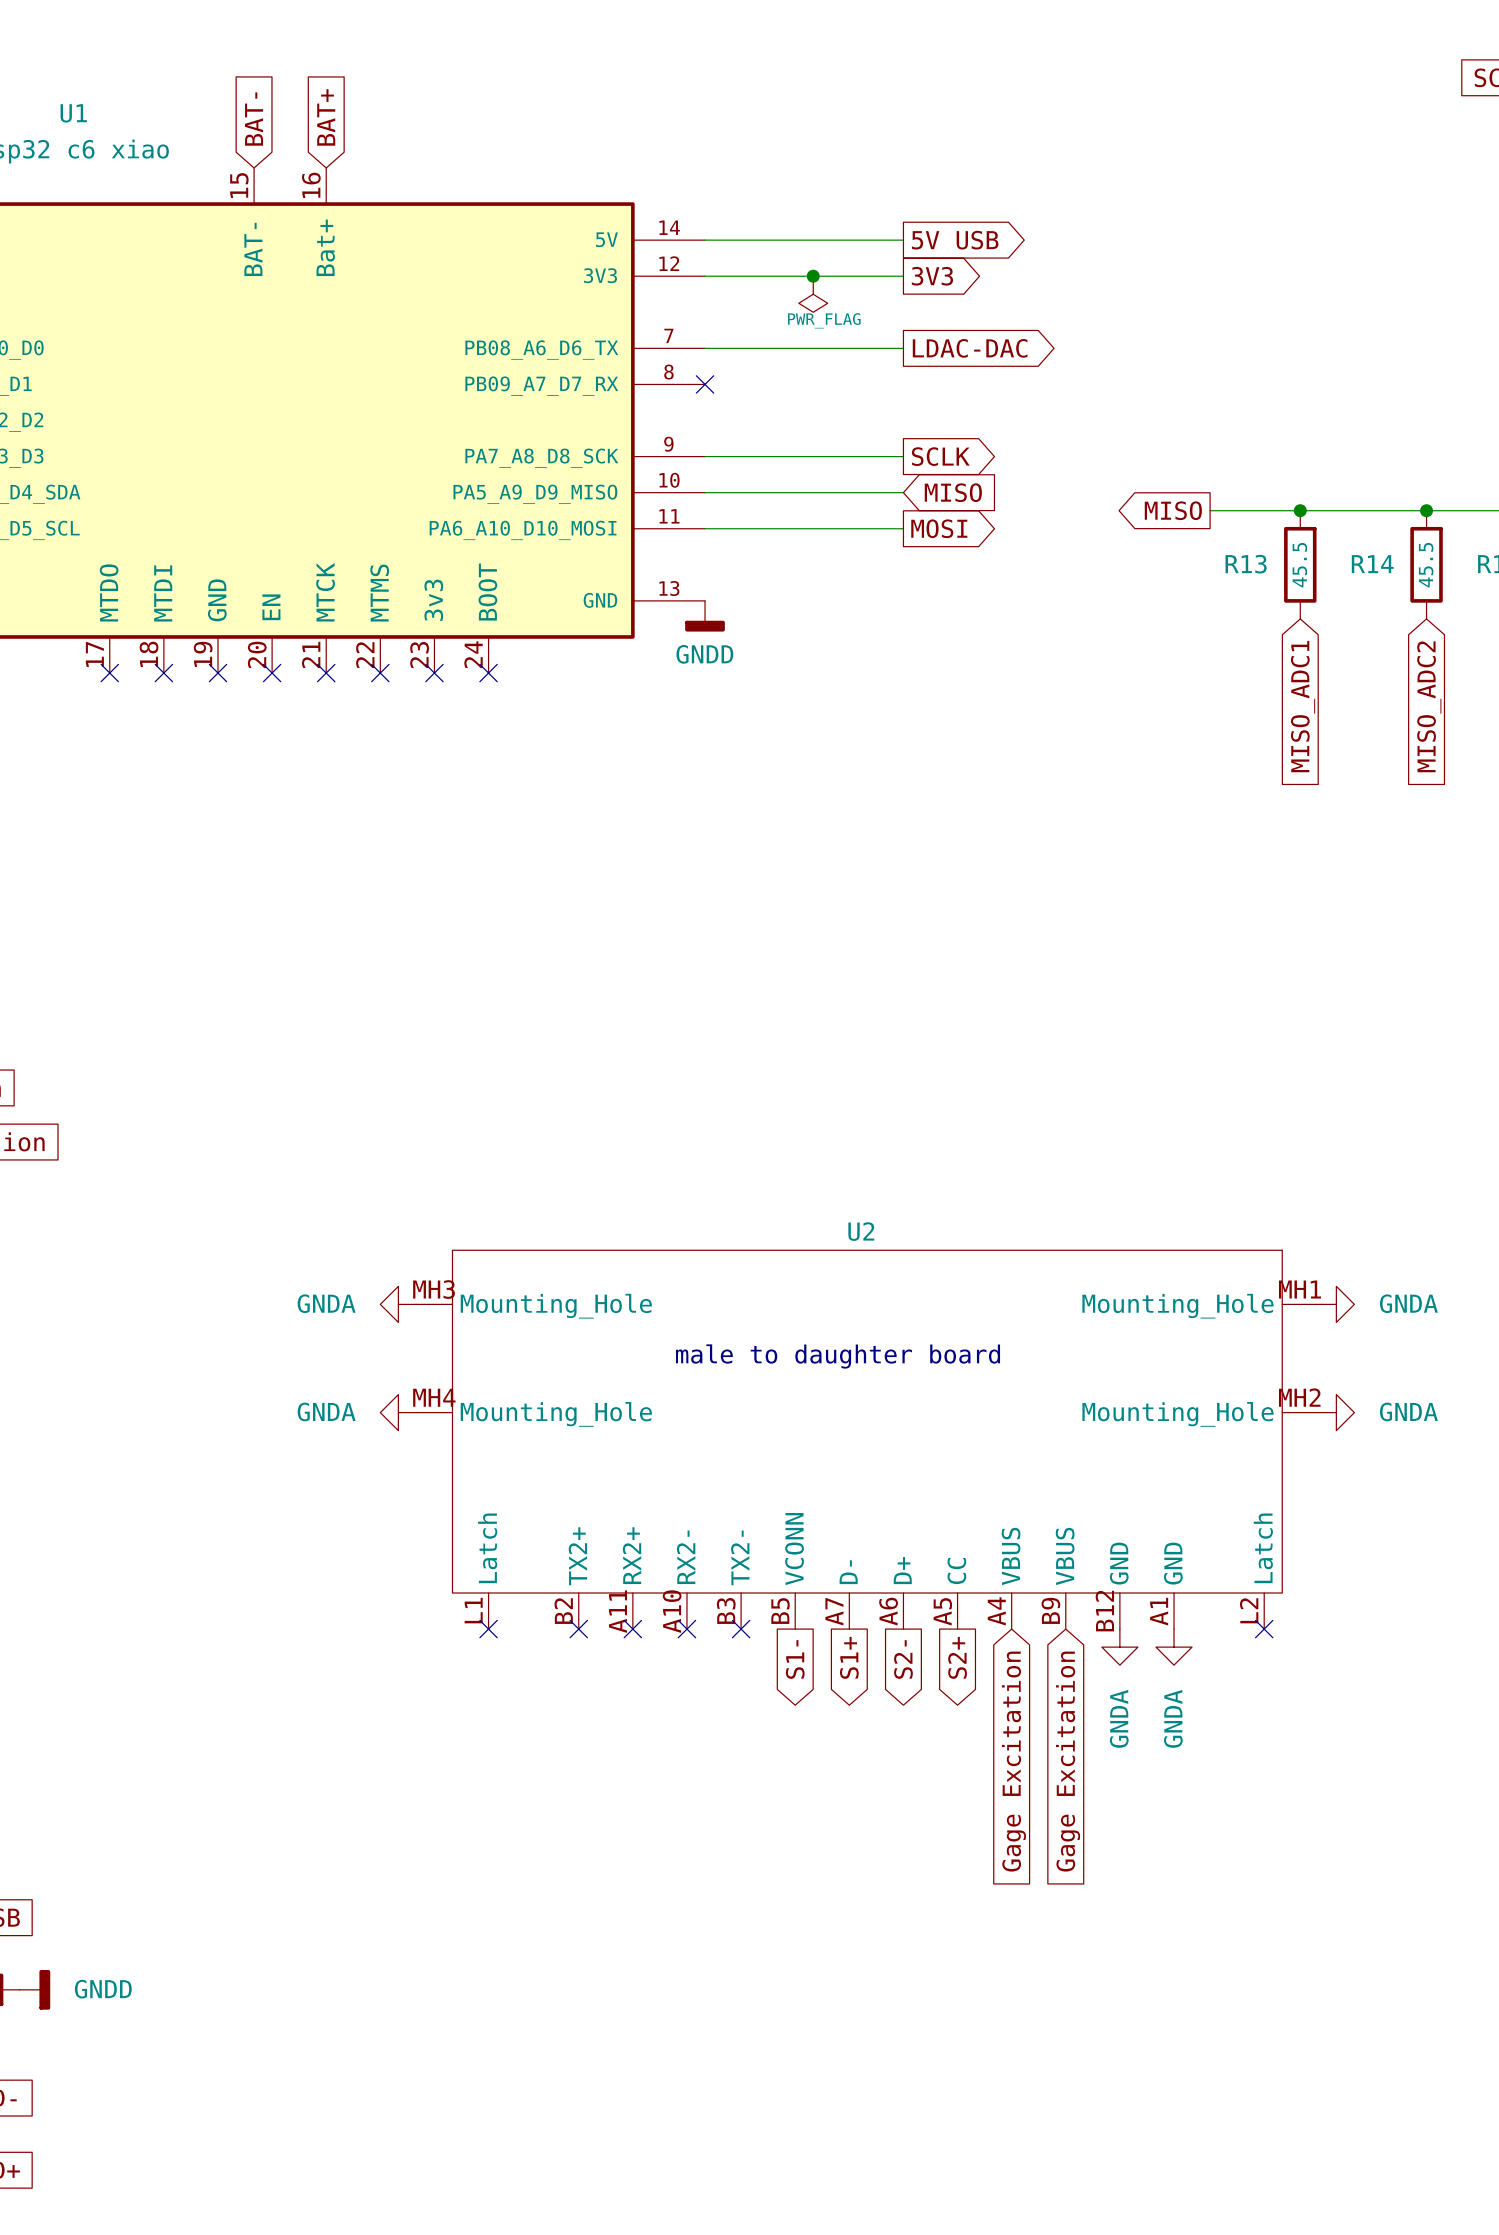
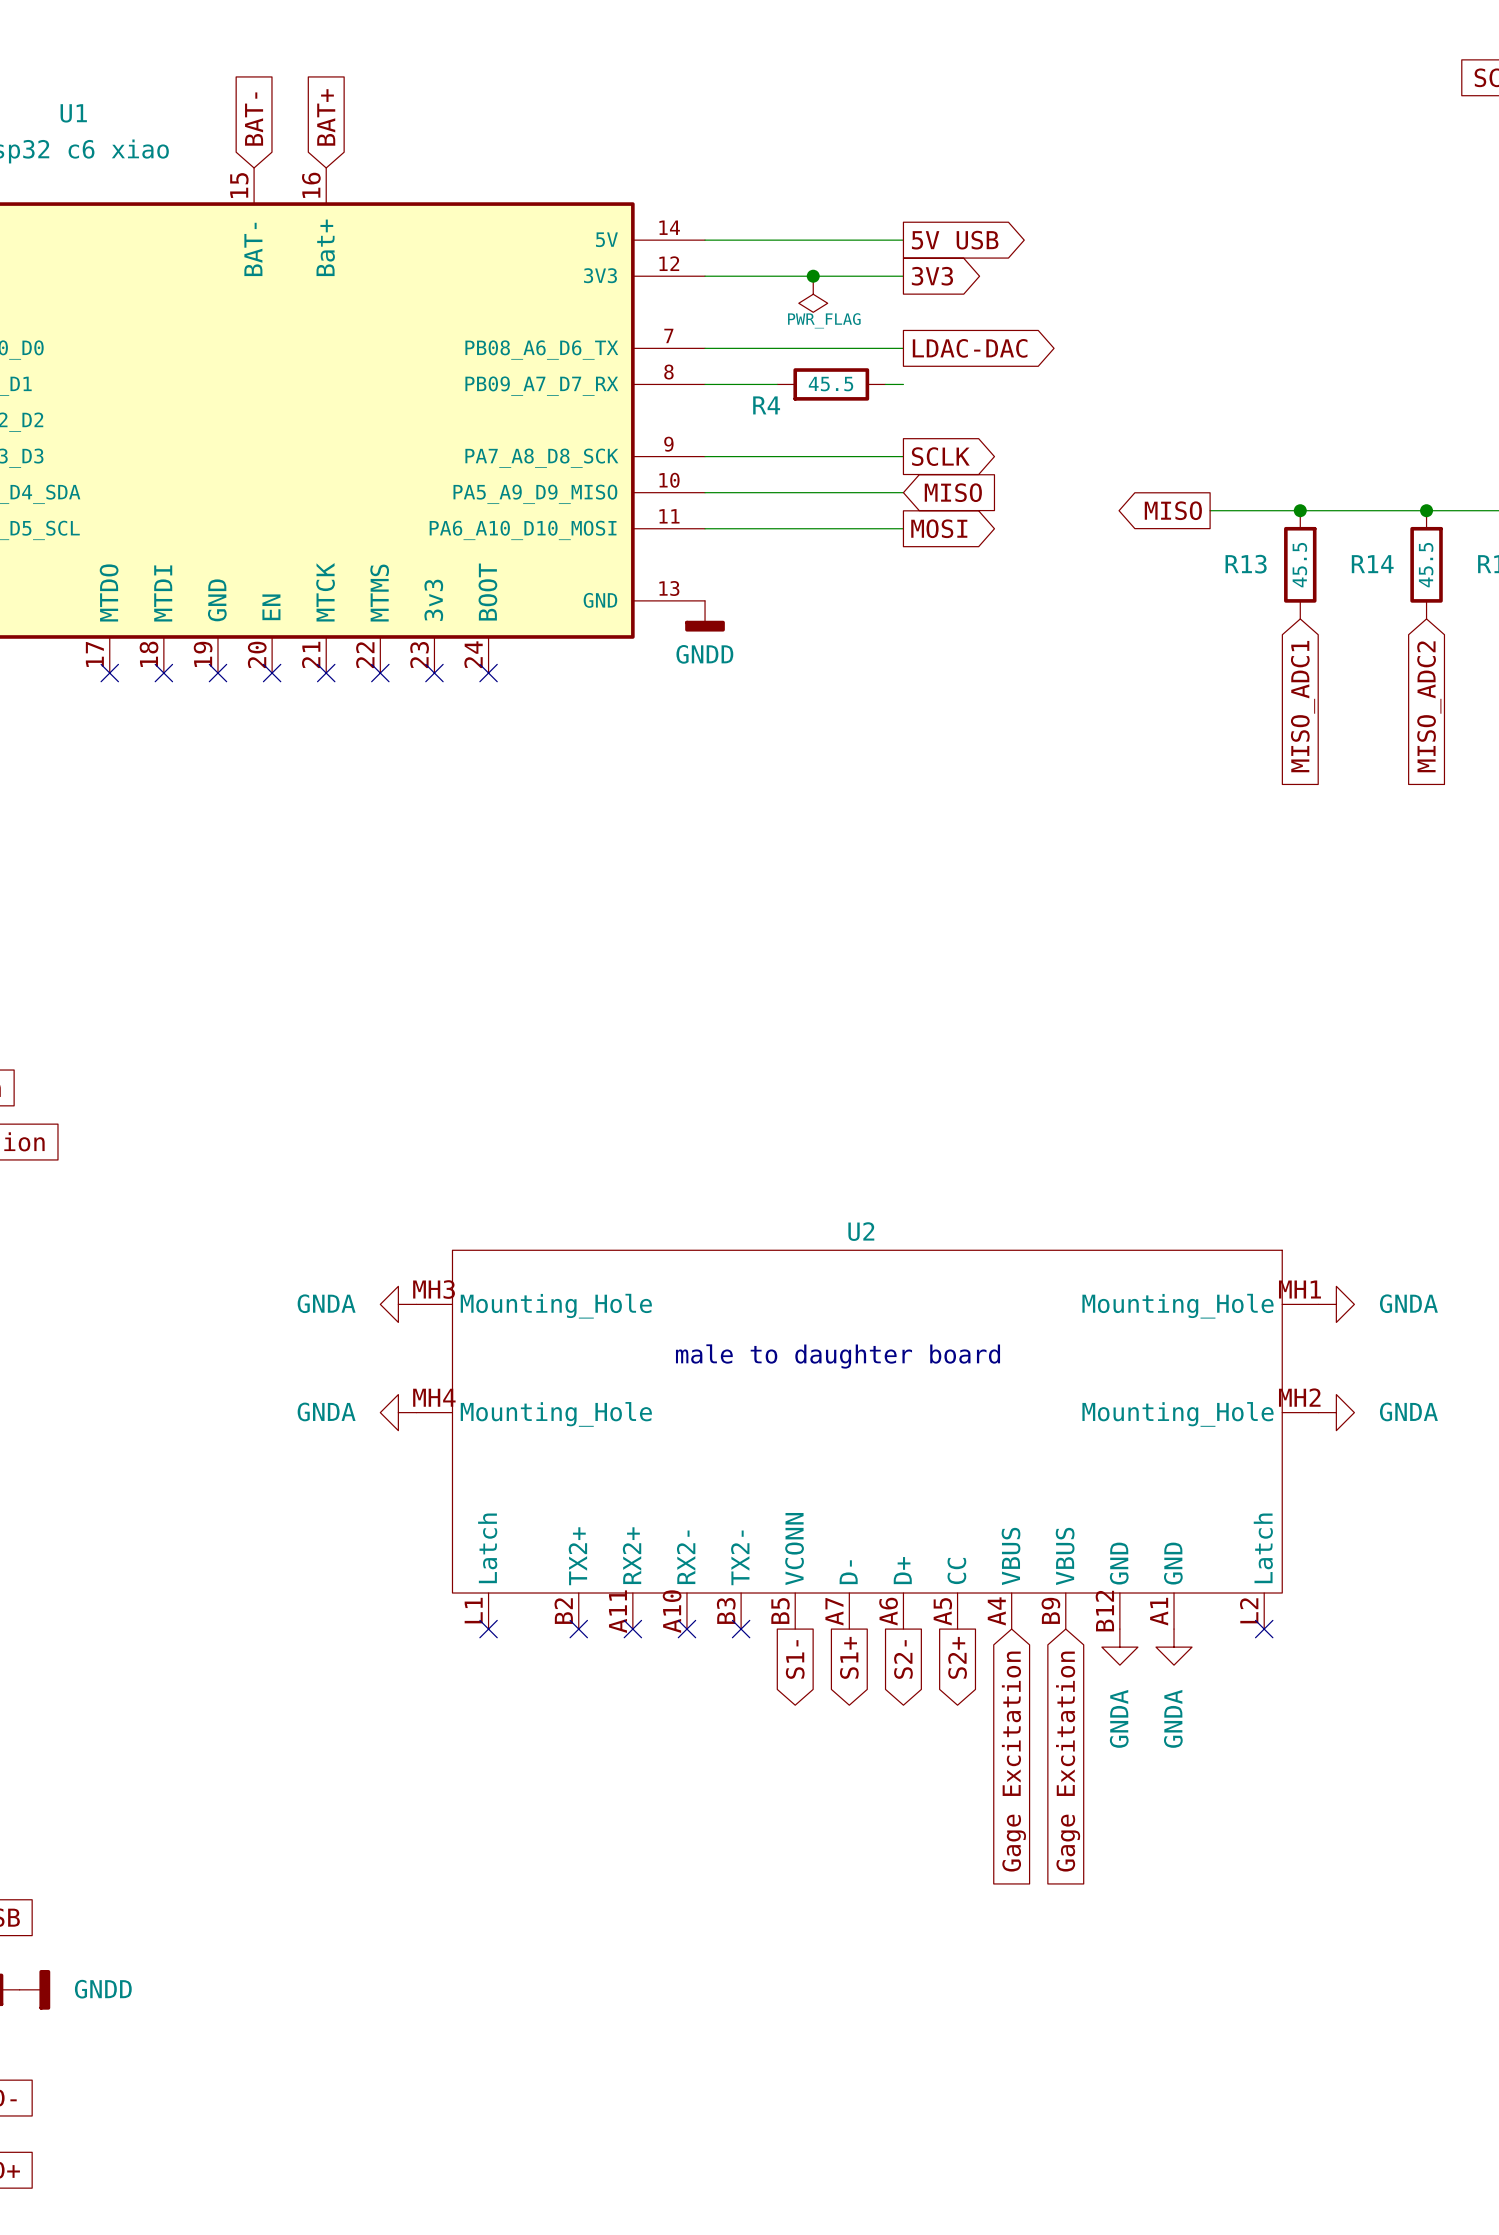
wire: none -> (705, 384) (777, 384)
no-connect mark: (705, 384) -> none
R4: none -> 45.5 (831, 384)
wire: none -> (885, 384) (903, 384)

